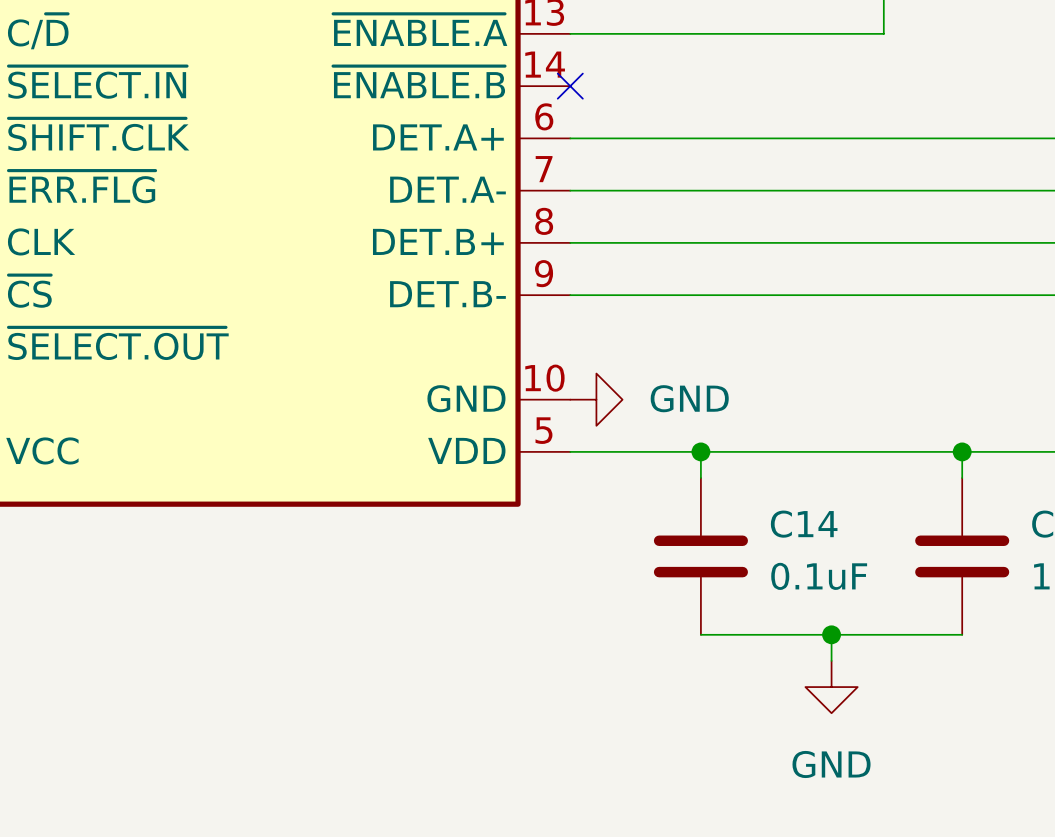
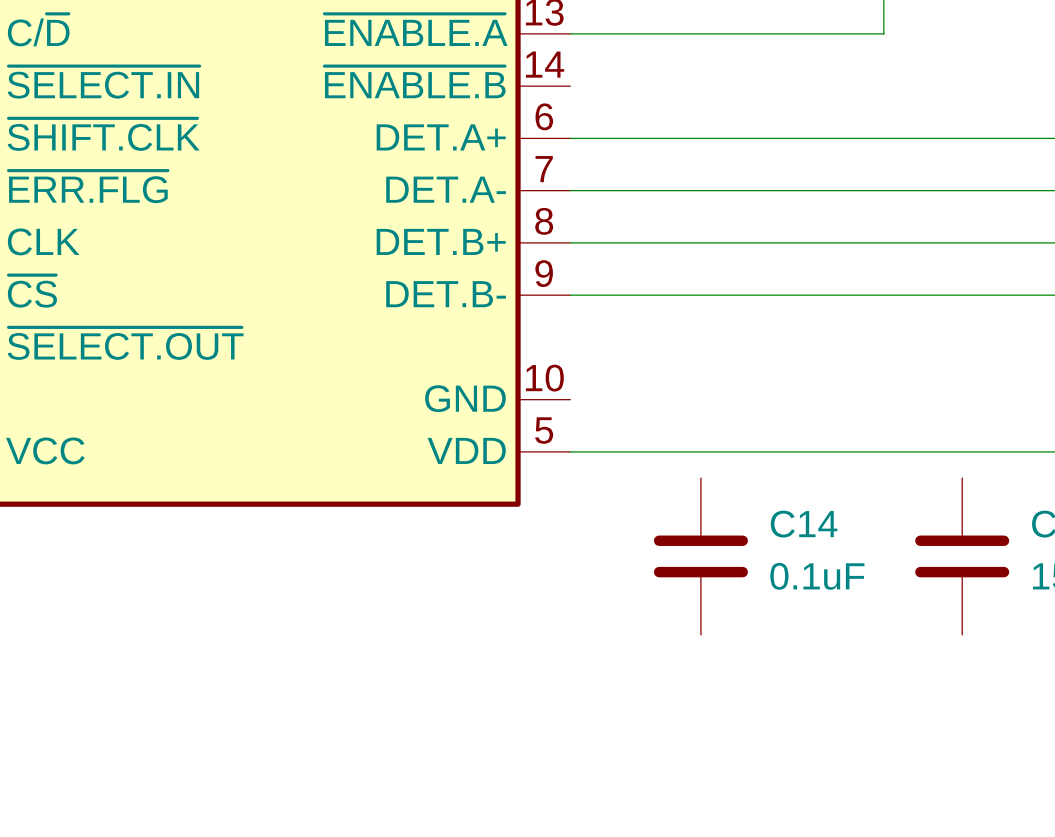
no-connect mark: (570, 86) -> none
power symbol: GND (596, 399) -> none
wire: (700, 451) (700, 478) -> none
junction: (700, 451) -> none
wire: (962, 451) (962, 478) -> none
junction: (962, 451) -> none
wire: (700, 634) (962, 634) -> none
wire: (831, 634) (831, 660) -> none
junction: (831, 634) -> none
power symbol: GND (831, 687) -> none

